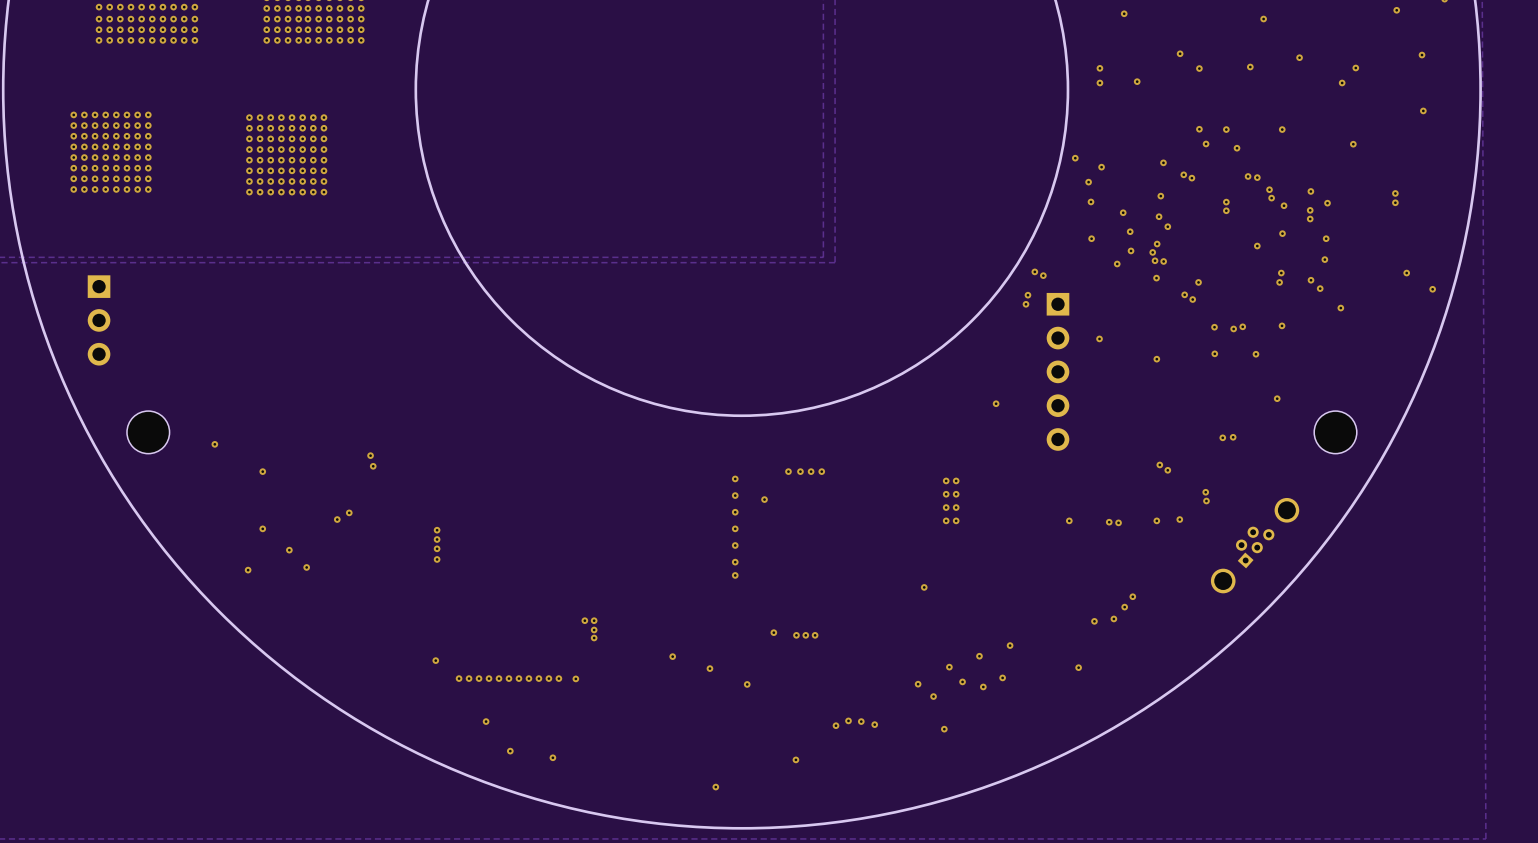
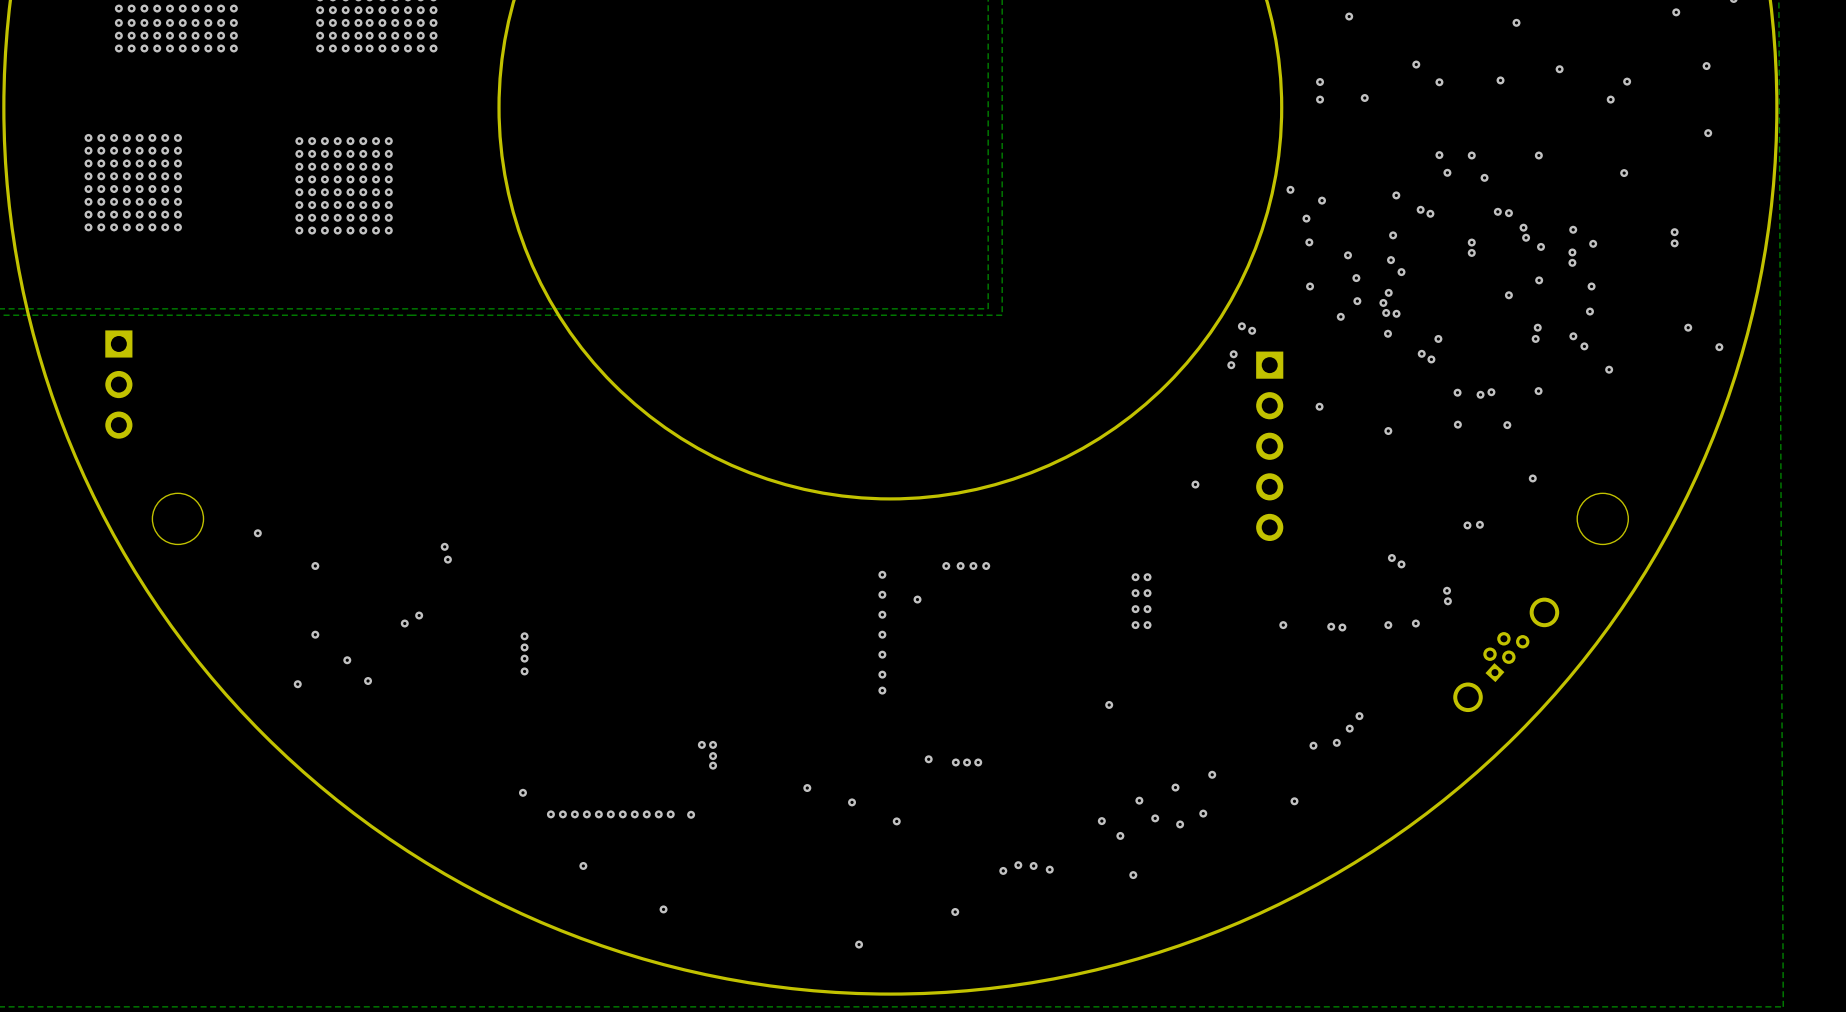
via: (510, 751) -> none

